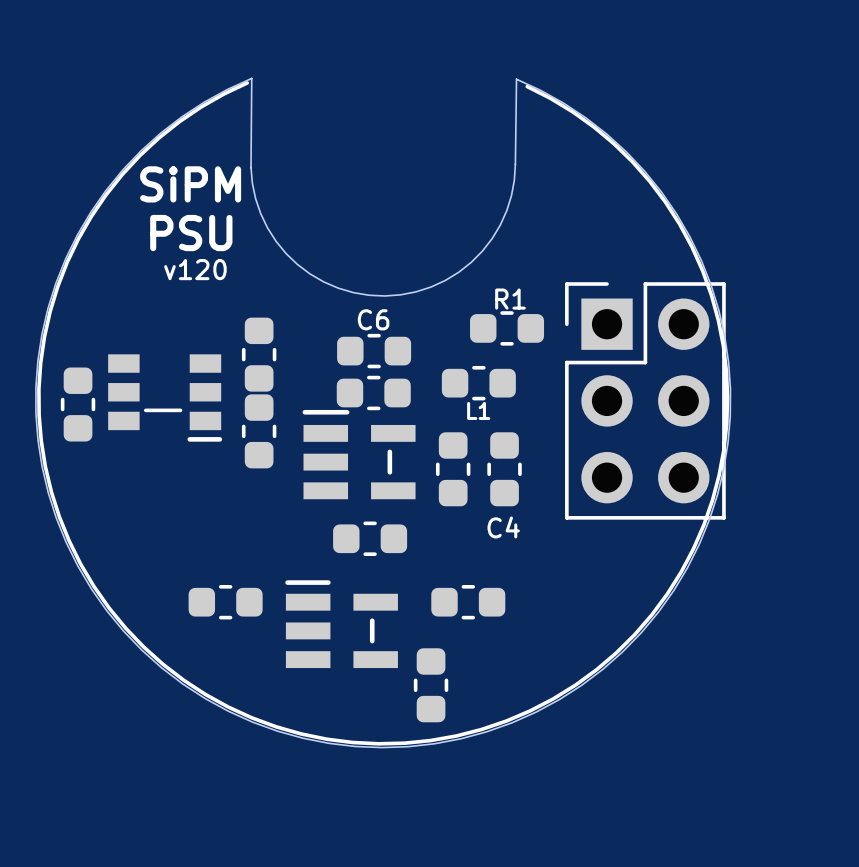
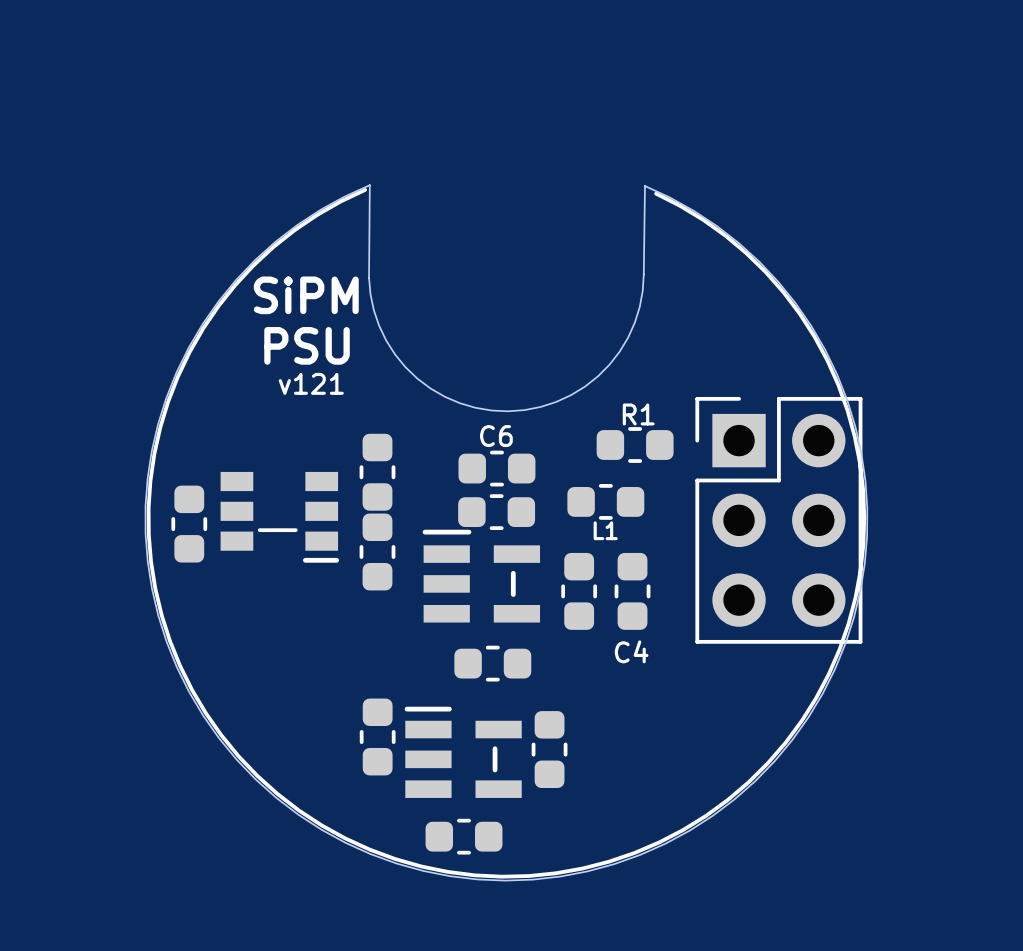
text: v120 (195, 269) -> v121 (311, 383)
part rotation: 0° (225, 602) -> 90° clockwise (377, 736)
part: (468, 602) -> none
part: none -> (549, 749)
part: (431, 685) -> none
part: none -> (464, 836)

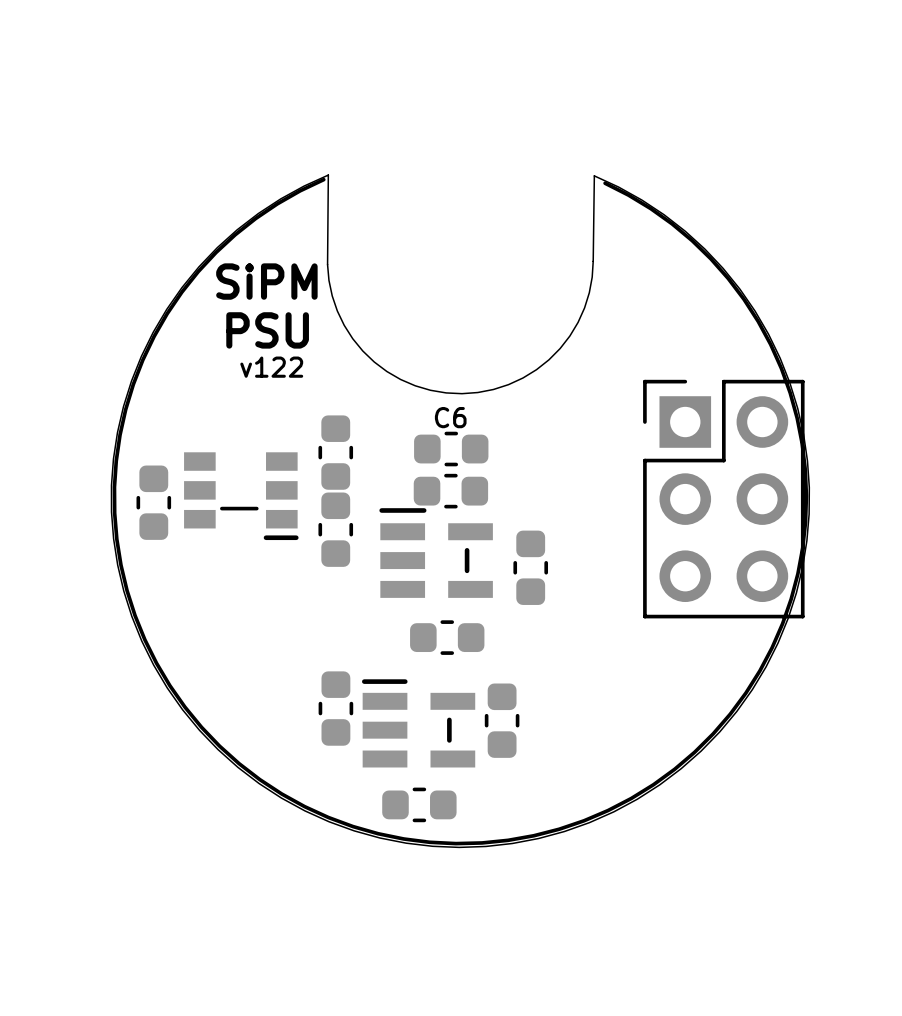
text: v121 (311, 383) -> v122 (271, 367)
R1: (635, 445) -> none
L1: (605, 501) -> none
C4: (632, 591) -> none

